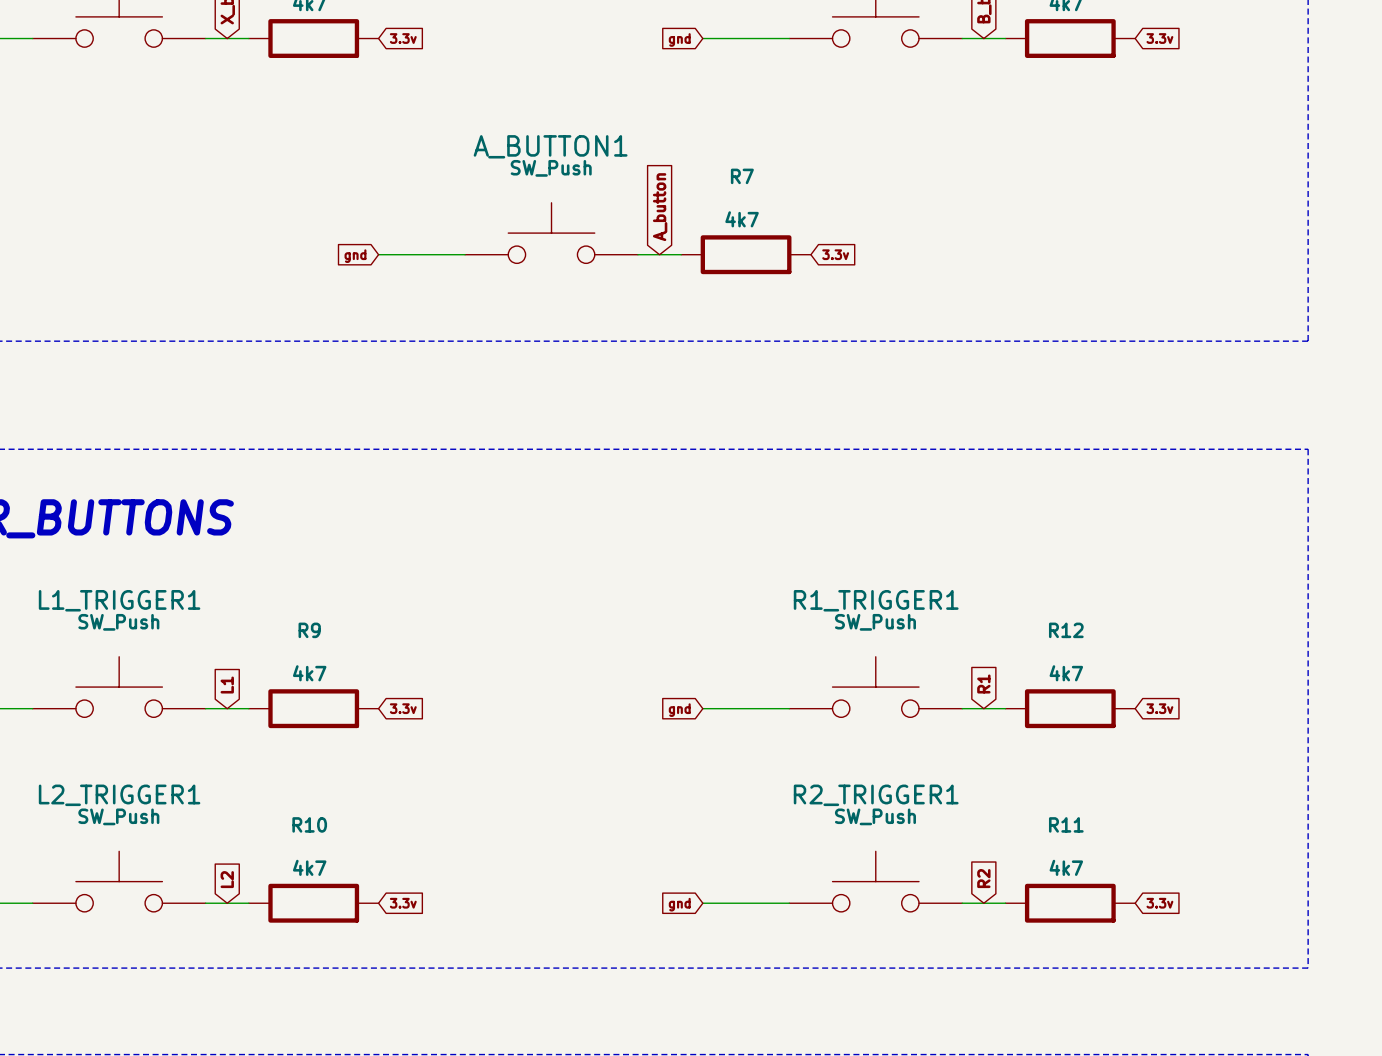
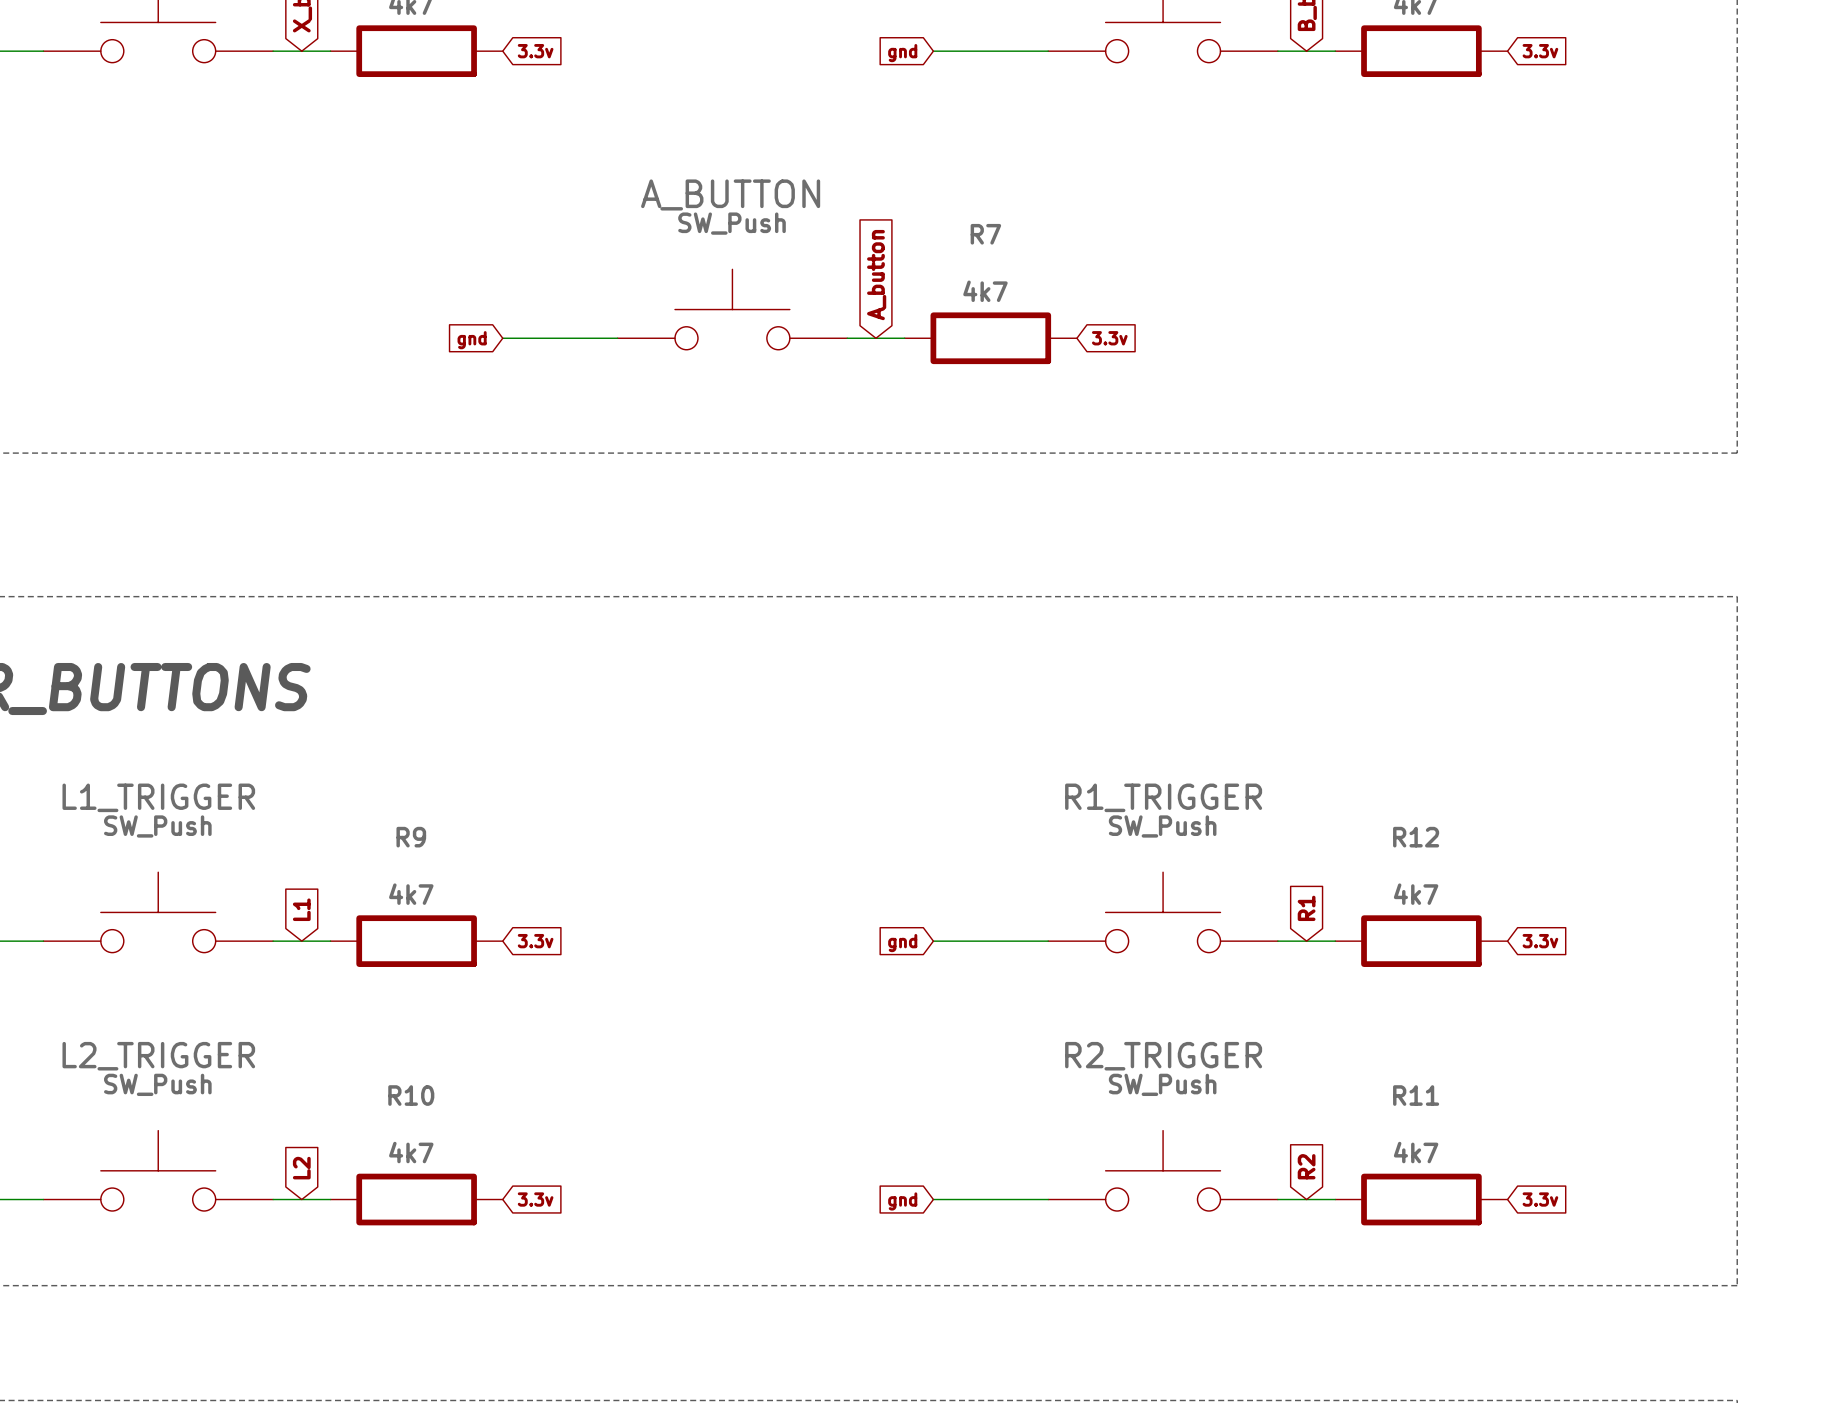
A_BUTTON1 name: A_BUTTON1 (550, 146) -> A_BUTTON (730, 194)
L1_TRIGGER1 name: L1_TRIGGER1 (119, 600) -> L1_TRIGGER (158, 797)
R1_TRIGGER1 name: R1_TRIGGER1 (876, 600) -> R1_TRIGGER (1163, 797)
L2_TRIGGER1 name: L2_TRIGGER1 (119, 795) -> L2_TRIGGER (158, 1056)
R2_TRIGGER1 name: R2_TRIGGER1 (876, 795) -> R2_TRIGGER (1163, 1056)

